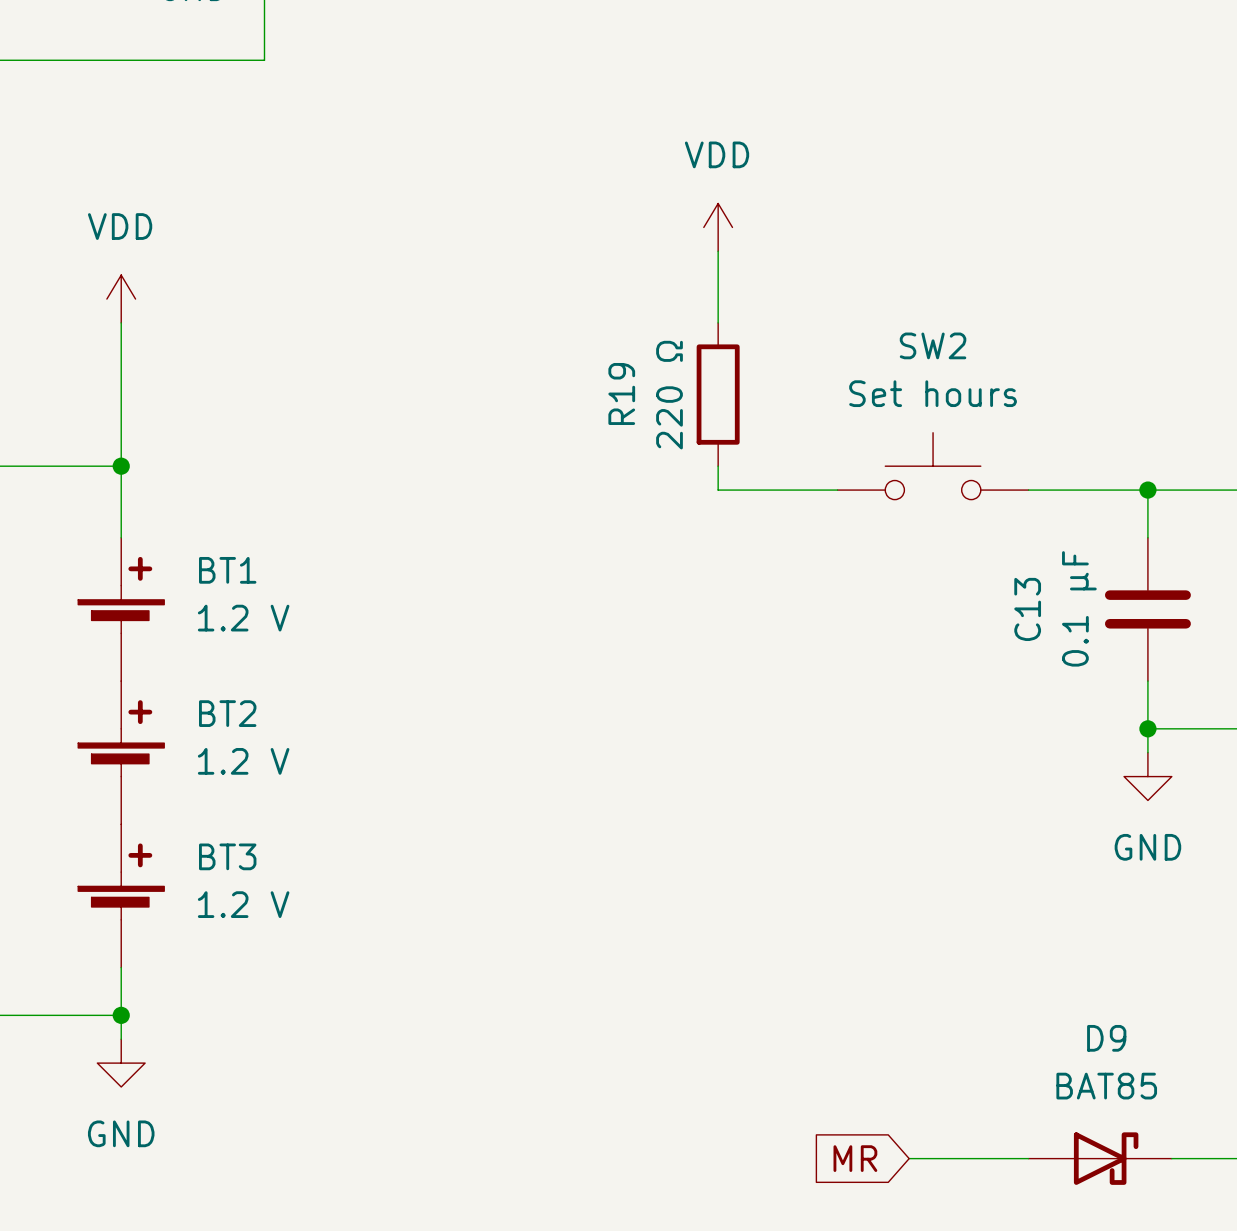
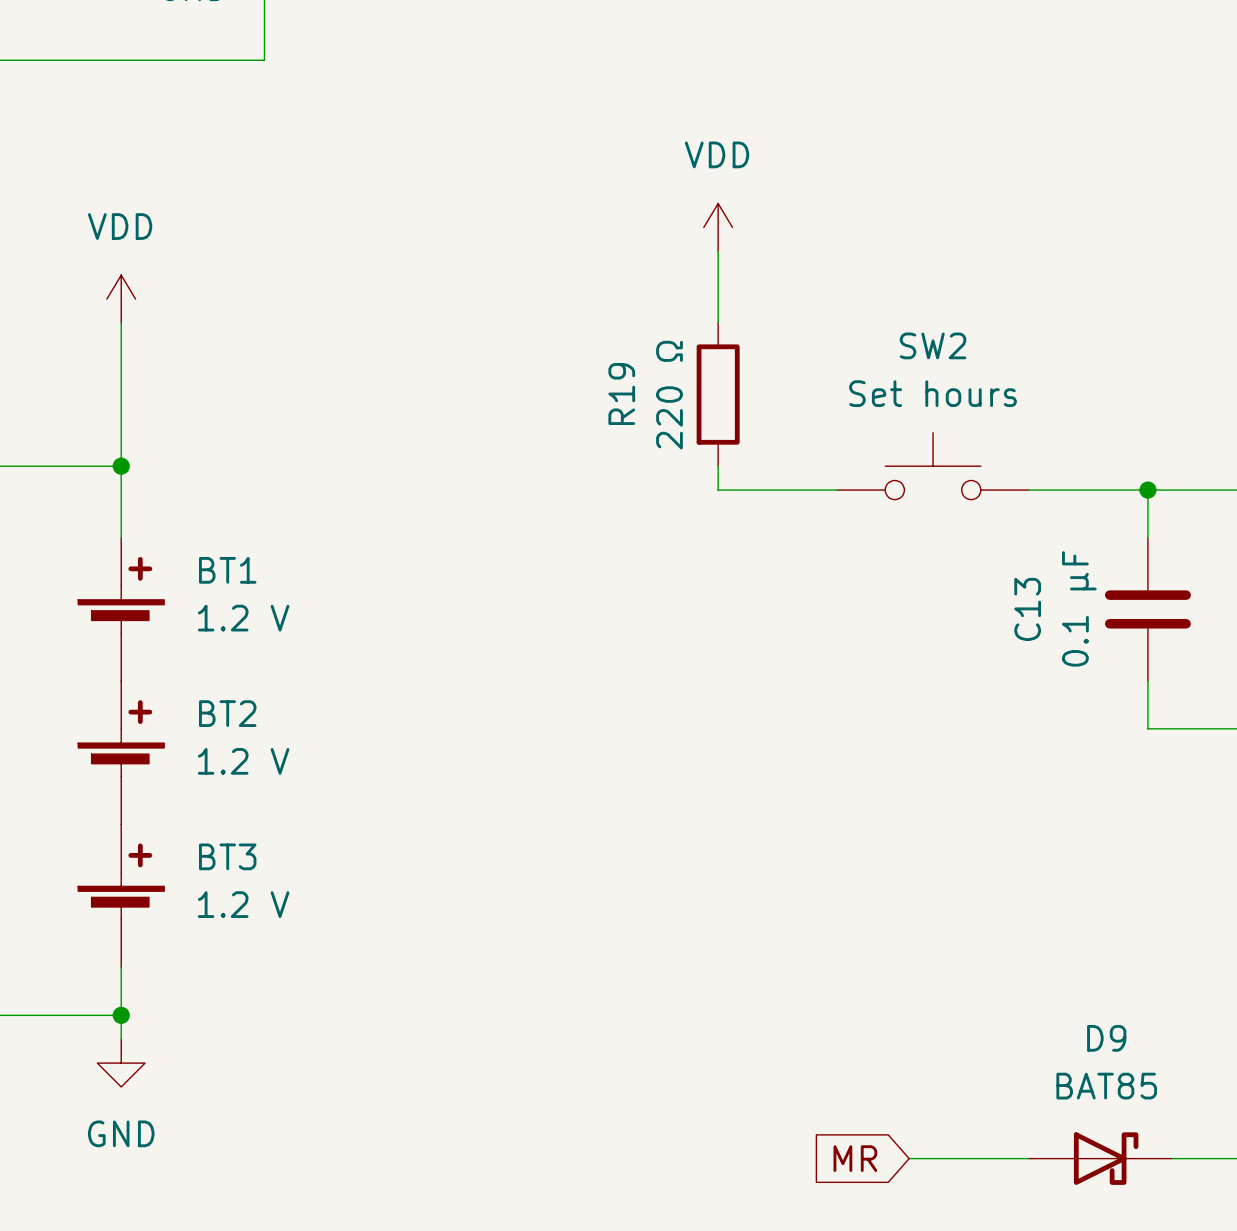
wire: (1147, 728) (1147, 752) -> none
junction: (1147, 728) -> none
power symbol: GND (1147, 776) -> none

